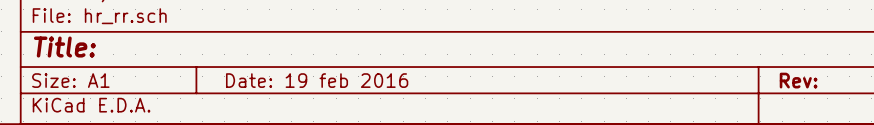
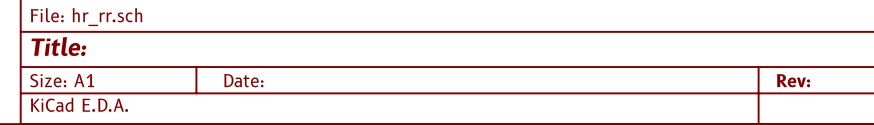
title block: Date: 19 feb 2016 (317, 80) -> Date: (243, 80)

